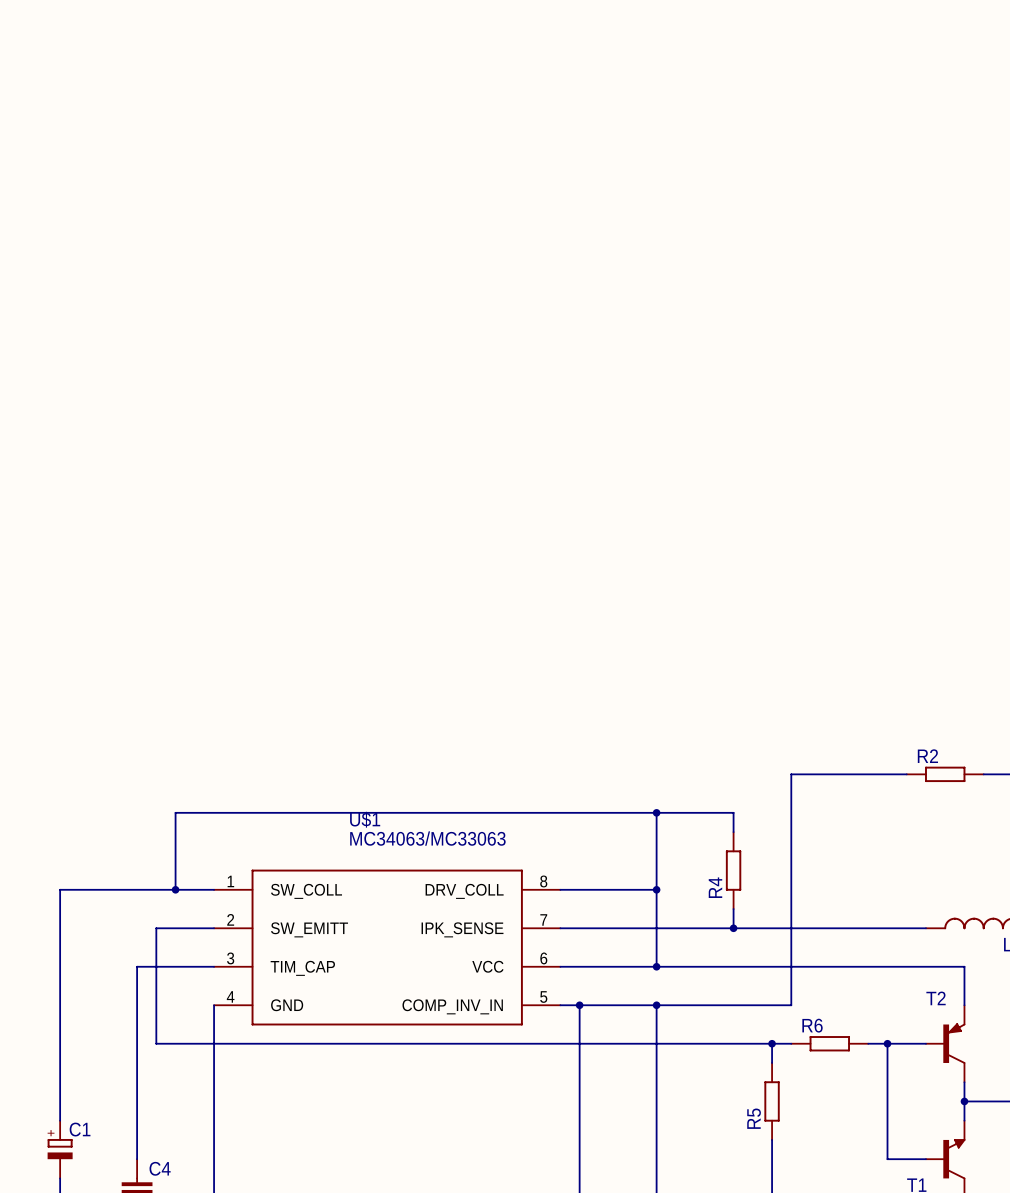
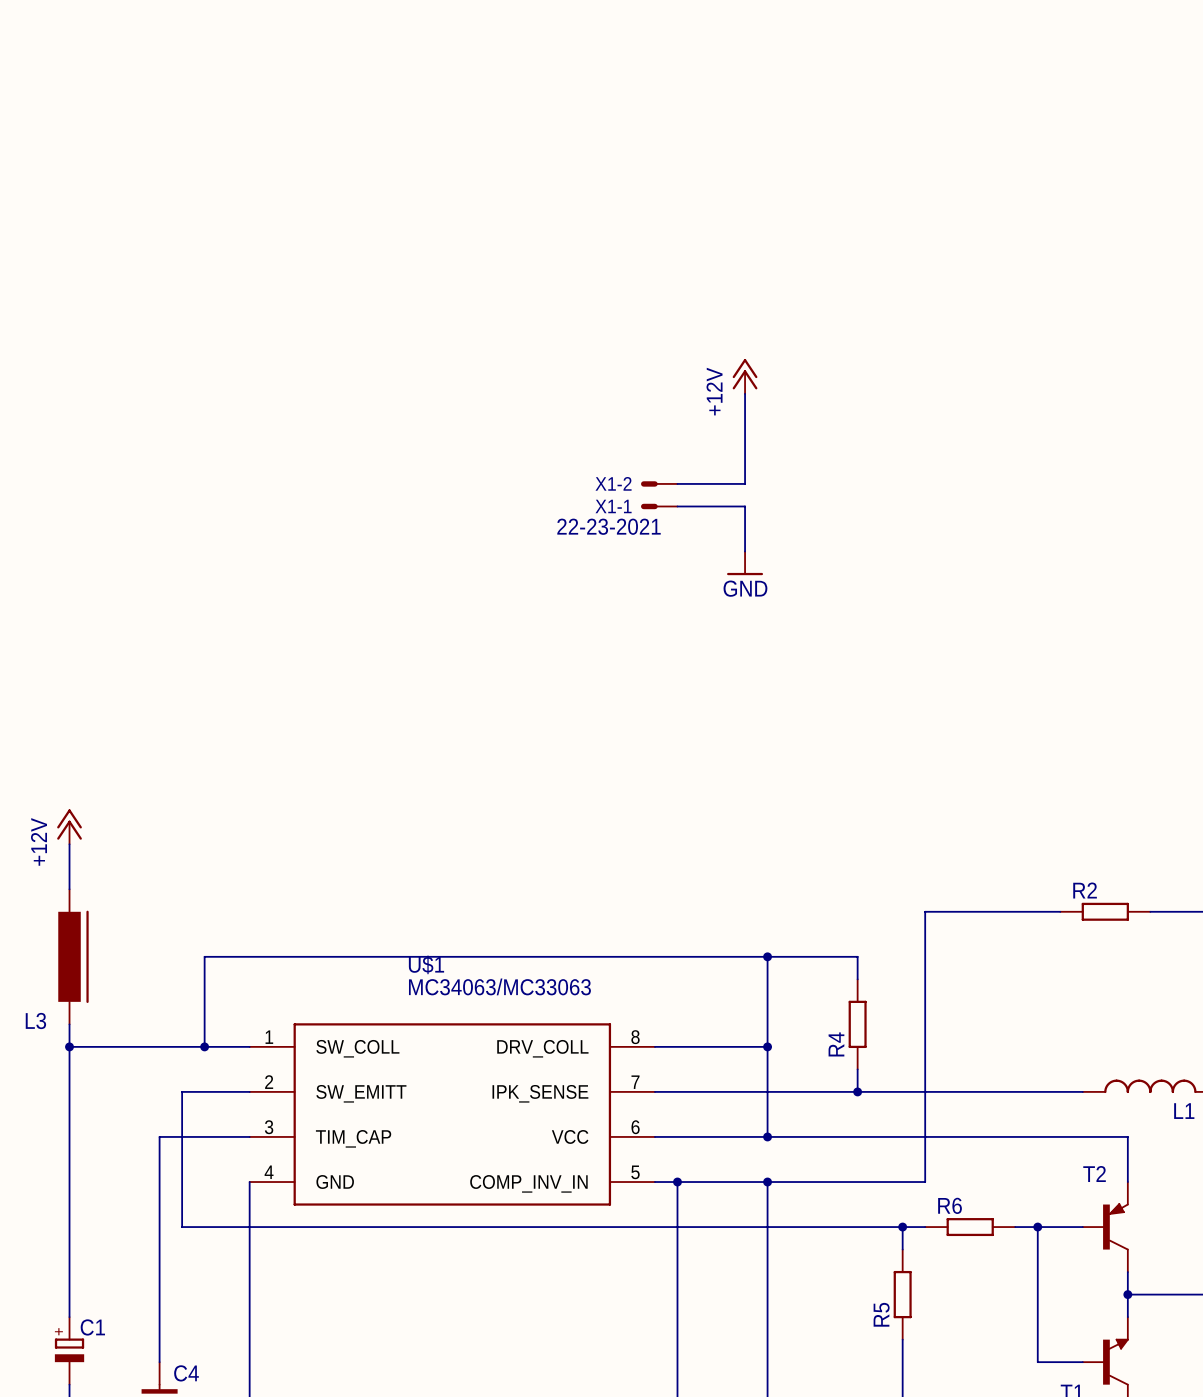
power symbol: none -> +12V (745, 376)
wire: none -> (745, 393) (745, 483) (677, 483)
X1-2: none -> (659, 483)
X1-1: none -> 22-23-2021 (659, 506)
wire: none -> (677, 506) (745, 506) (745, 551)
power symbol: none -> GND (745, 563)
power symbol: none -> +12V (69, 826)
wire: none -> (69, 844) (69, 889)
L3: none -> (73, 956)
wire: none -> (69, 1024) (69, 1046)
junction: none -> (69, 1046)

